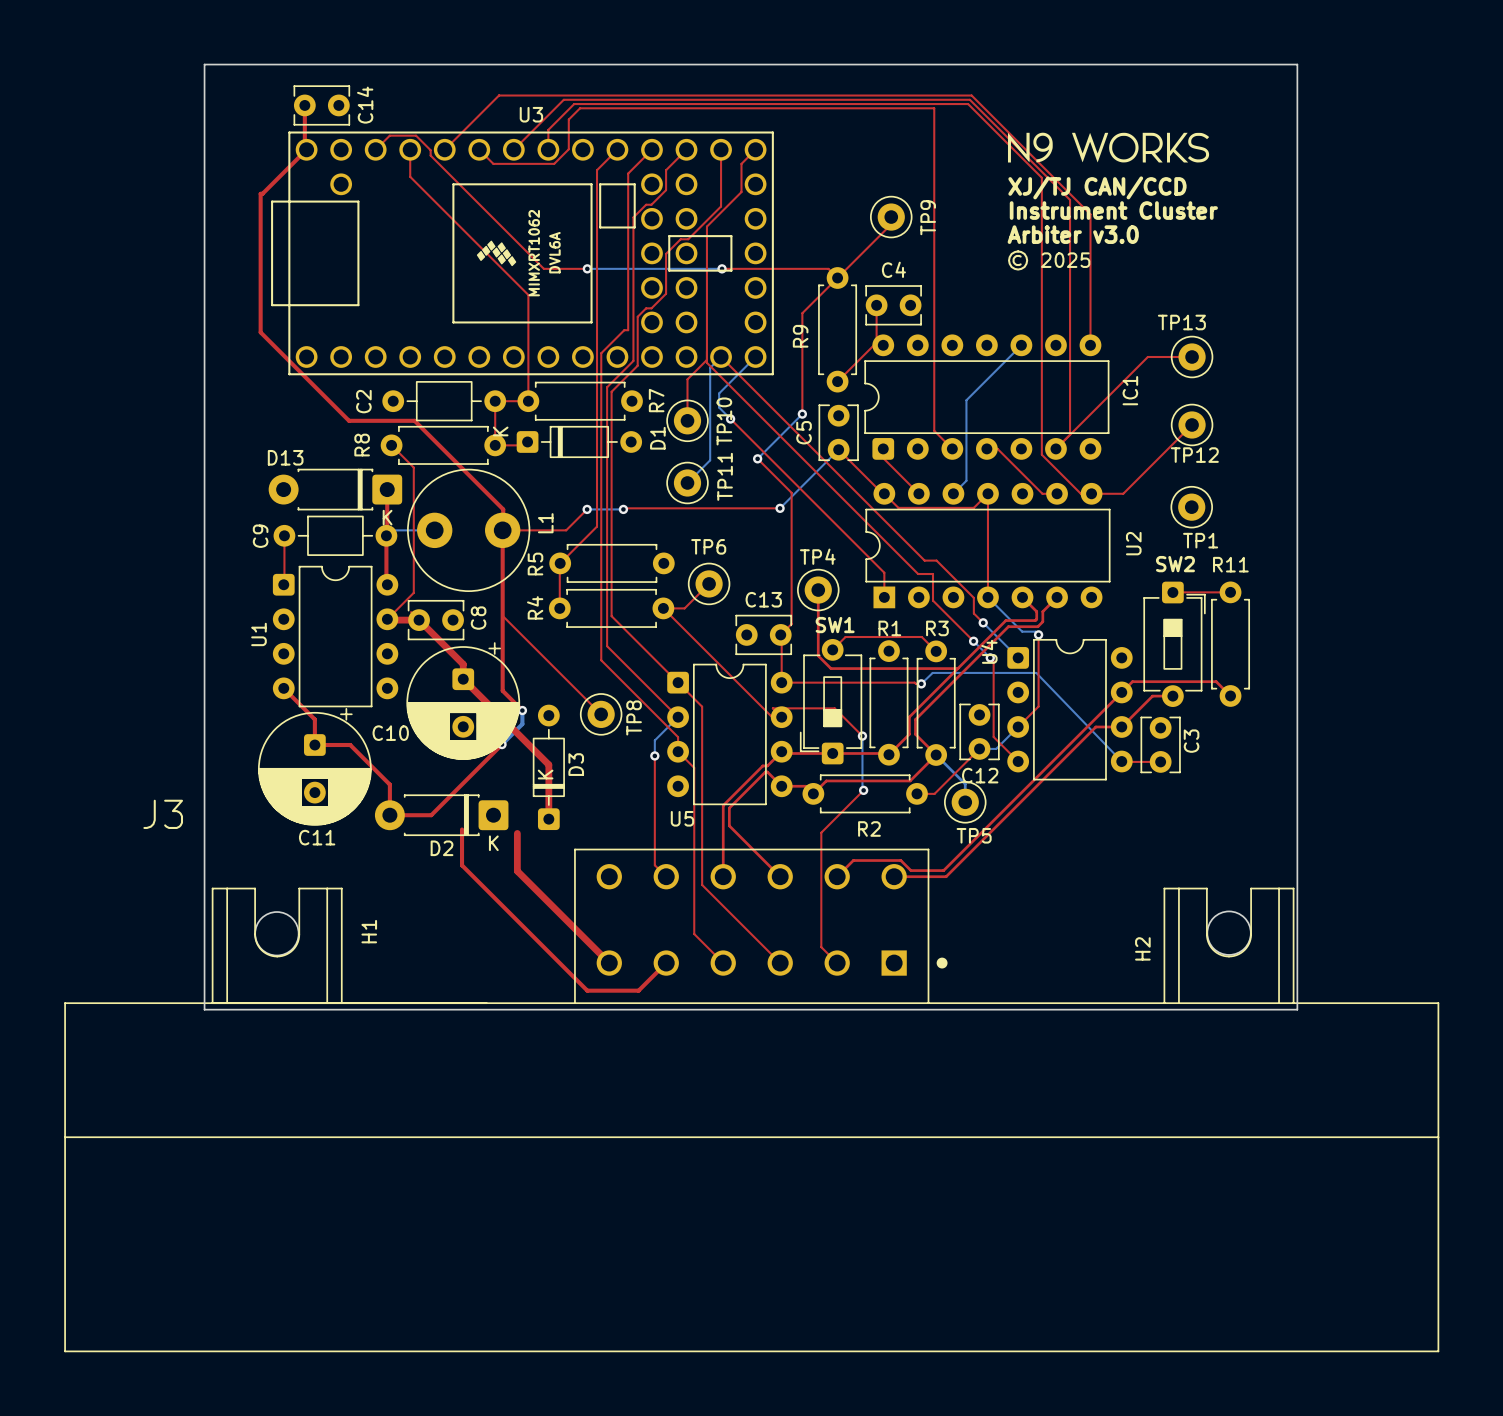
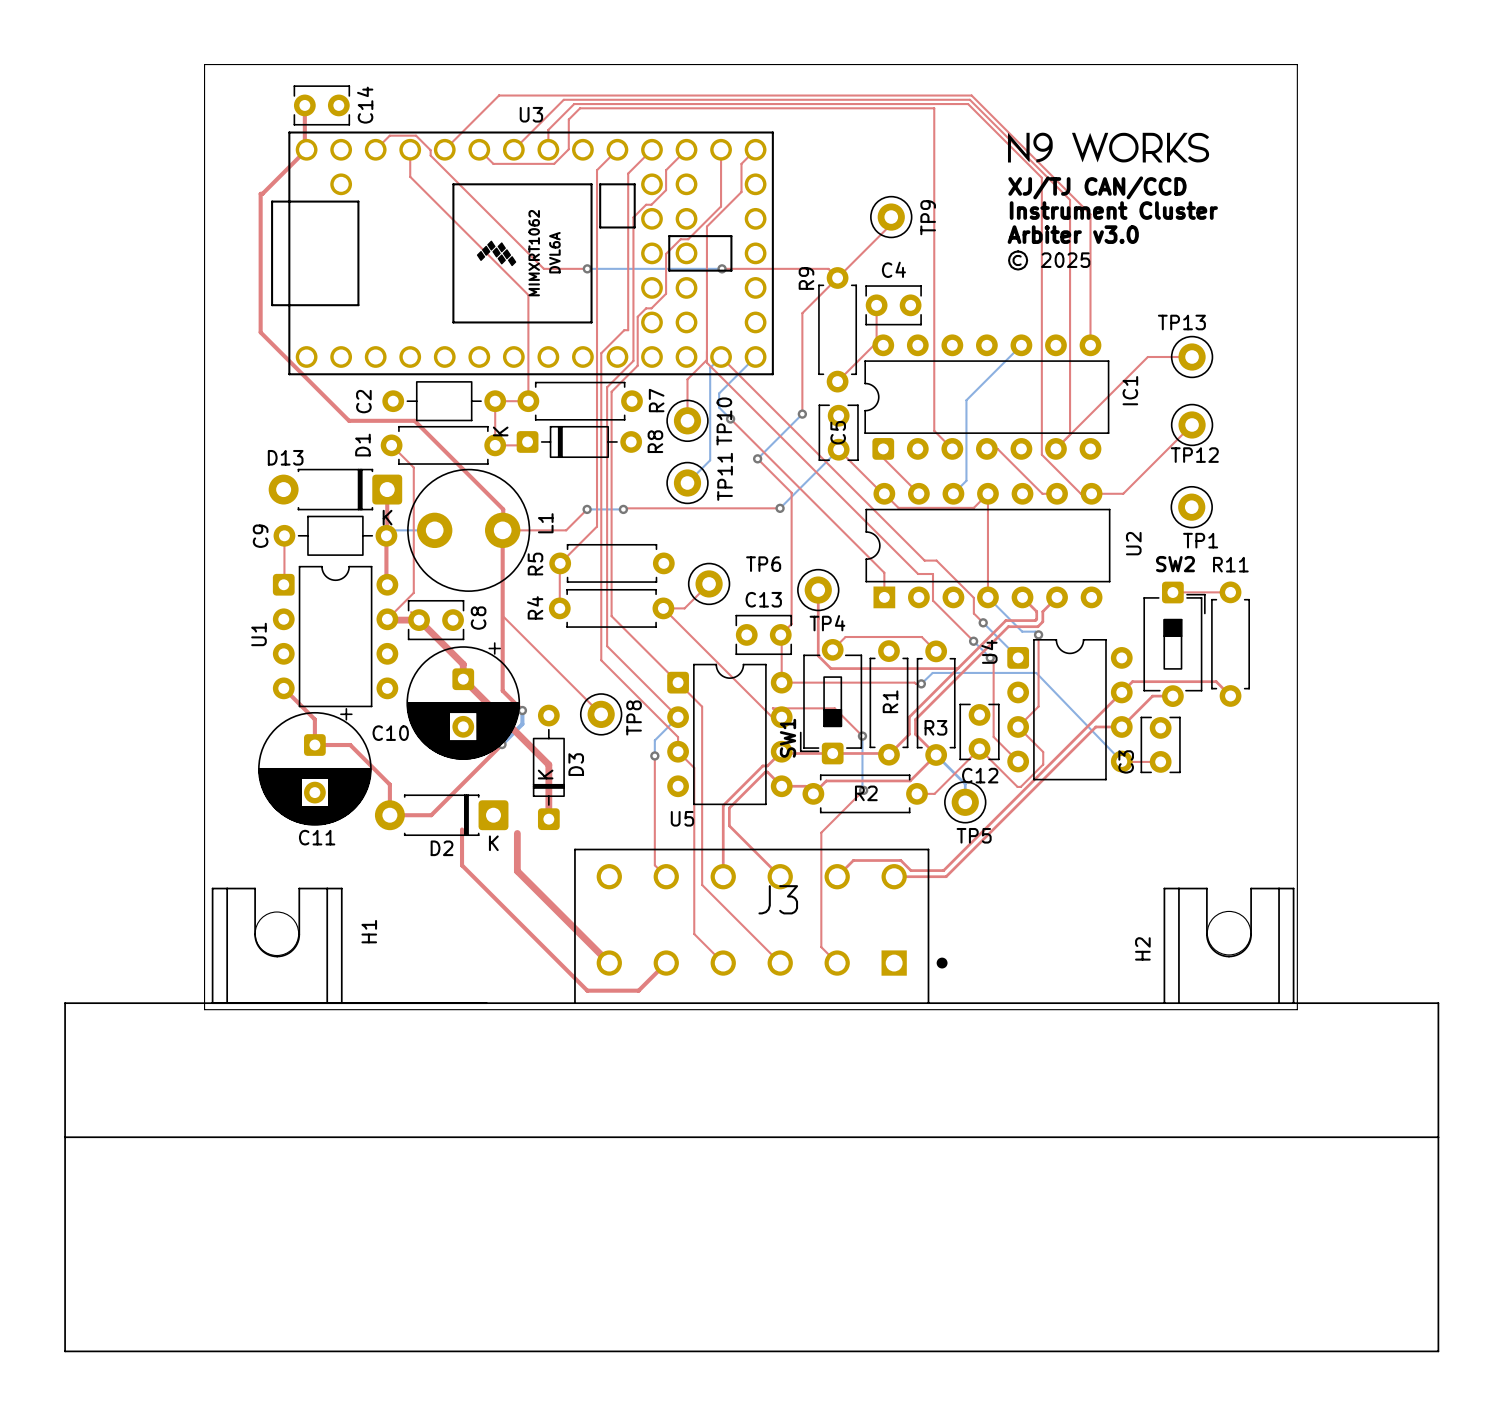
R9 name position: R9 (800, 336) -> R9 (806, 278)
C5 name position: C5 (804, 432) -> C5 (838, 432)
D1 name position: D1 (657, 438) -> D1 (362, 445)
R8 name position: R8 (362, 445) -> R8 (655, 441)
TP6 name position: TP6 (708, 546) -> TP6 (763, 564)
TP4 name position: TP4 (817, 556) -> TP4 (827, 623)
SW1 name rotation: 0° (835, 625) -> 90° counterclockwise (787, 738)
SW1 name position: SW1 (835, 625) -> SW1 (787, 738)
R1 name rotation: 0° (889, 628) -> 90° counterclockwise (890, 701)
R1 name position: R1 (889, 628) -> R1 (890, 701)
R3 name position: R3 (937, 628) -> R3 (935, 727)
top track: none -> (1018, 726) (1043, 752) (1043, 764) (1020, 786) (1017, 786) (979, 748)
bottom track: (1018, 726) (996, 748) (979, 748) -> none
C3 name position: C3 (1191, 741) -> C3 (1126, 761)
J3 name position: J3 (163, 814) -> J3 (778, 899)
R2 name position: R2 (869, 828) -> R2 (866, 793)

